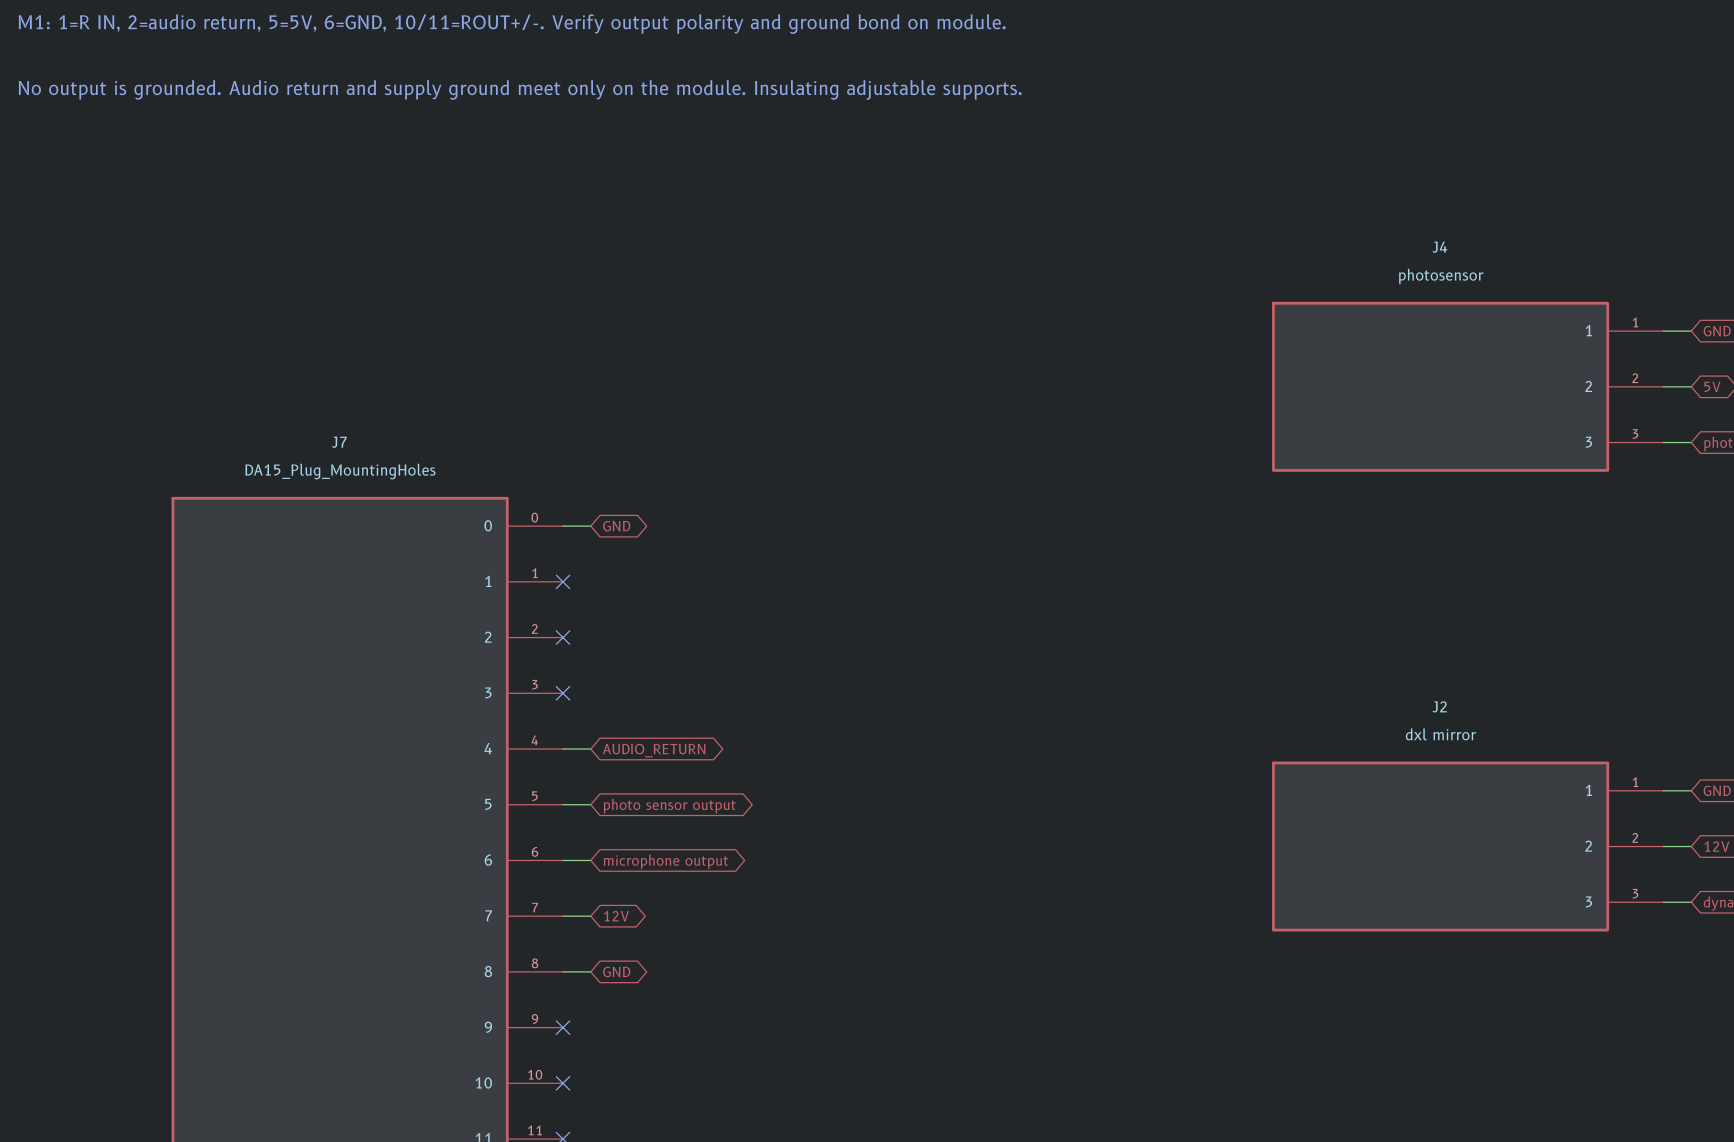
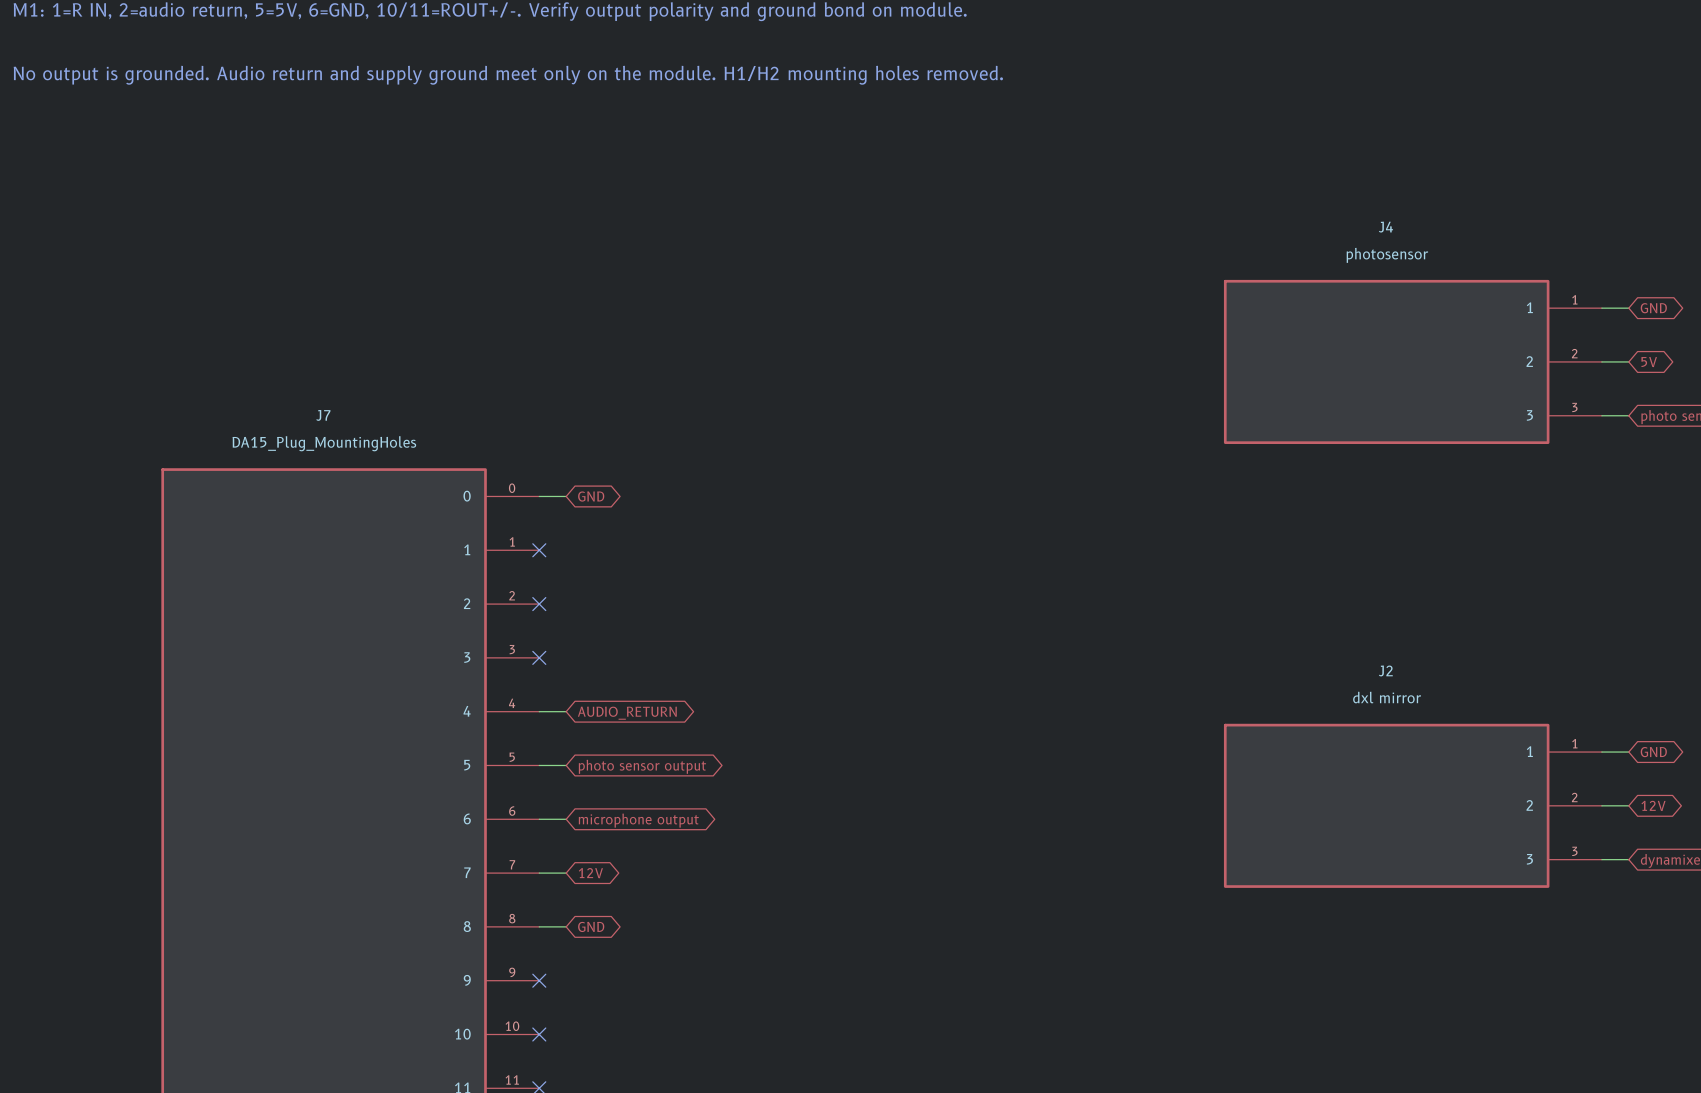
text: No output is grounded. Audio return and supply ground meet only on the module. Insulating adjustable supports. (520, 89) -> No output is grounded. Audio return and supply ground meet only on the module. H1/H2 mounting holes removed. (508, 75)

